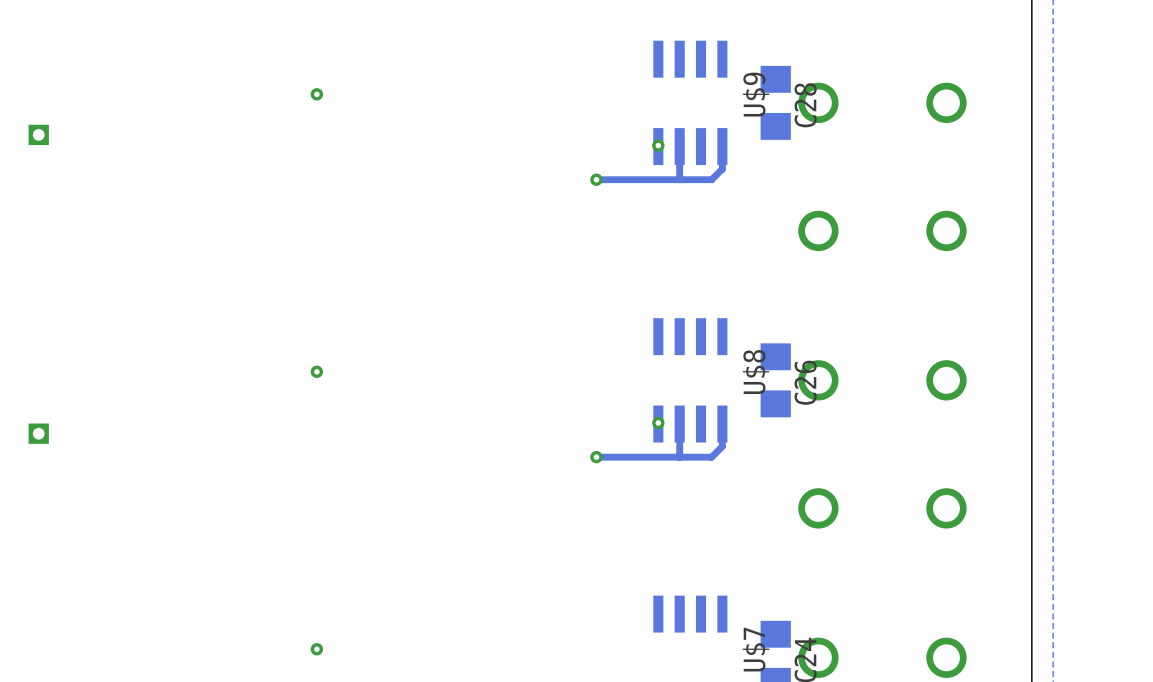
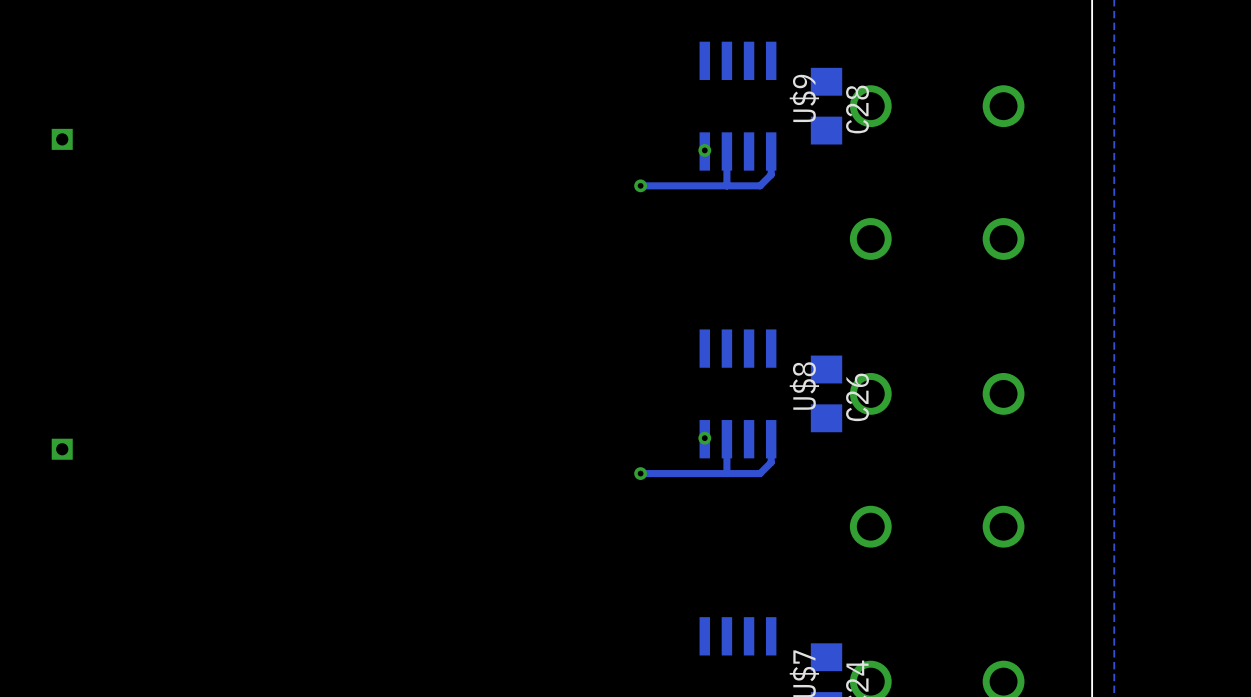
via: (316, 94) -> none
via: (316, 371) -> none
via: (316, 649) -> none

